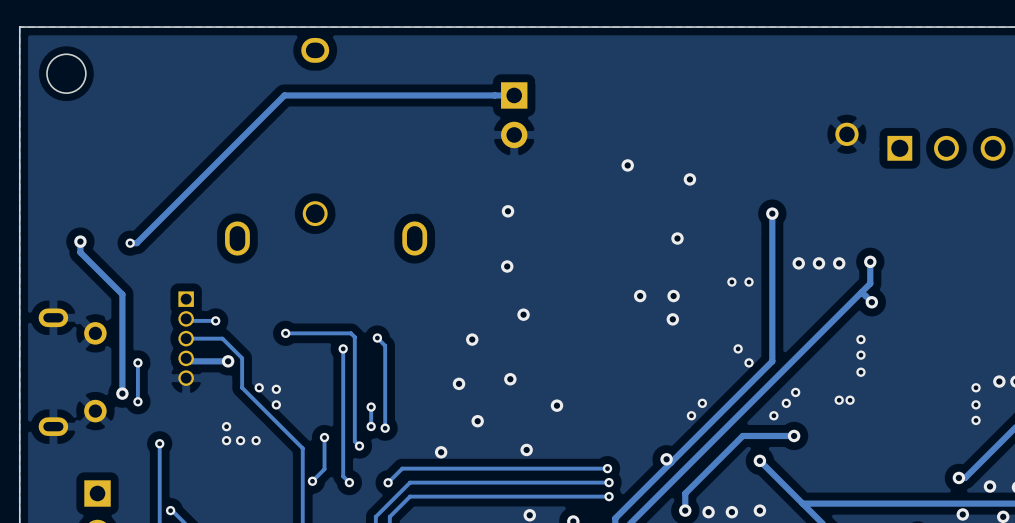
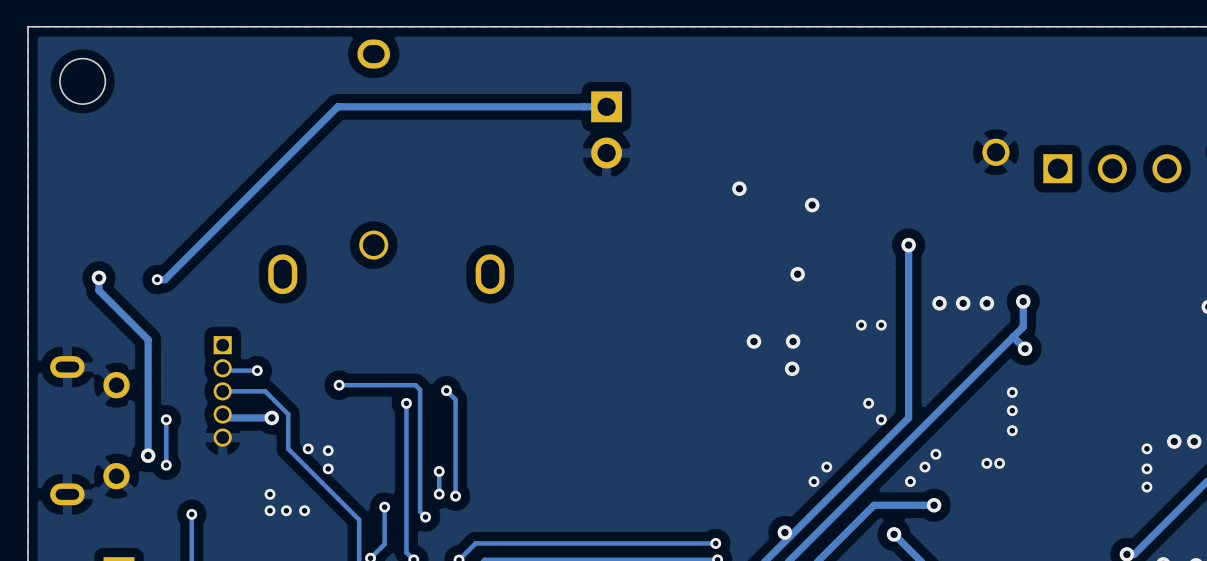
via: (508, 211) -> none
via: (507, 266) -> none
via: (523, 314) -> none
via: (472, 339) -> none
via: (510, 379) -> none
via: (459, 383) -> none
via: (556, 405) -> none
via: (477, 421) -> none
via: (526, 449) -> none
via: (441, 452) -> none

